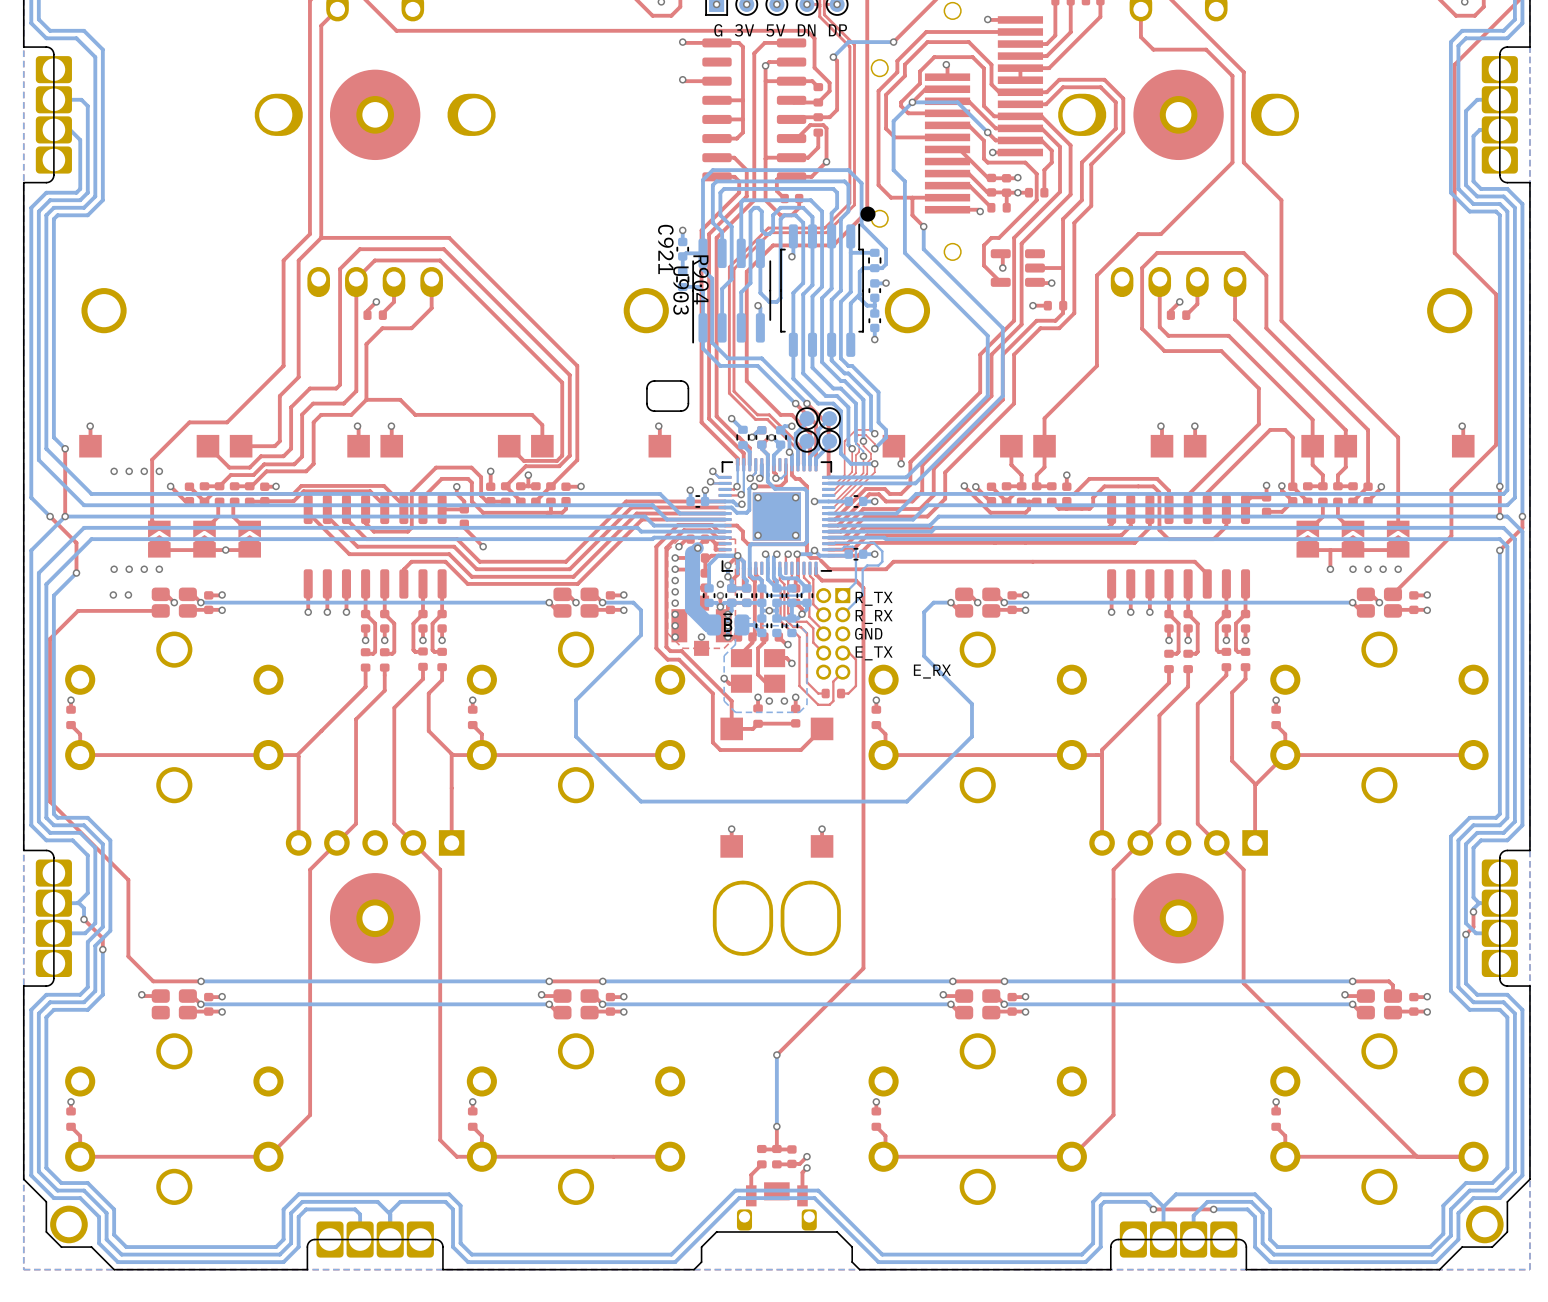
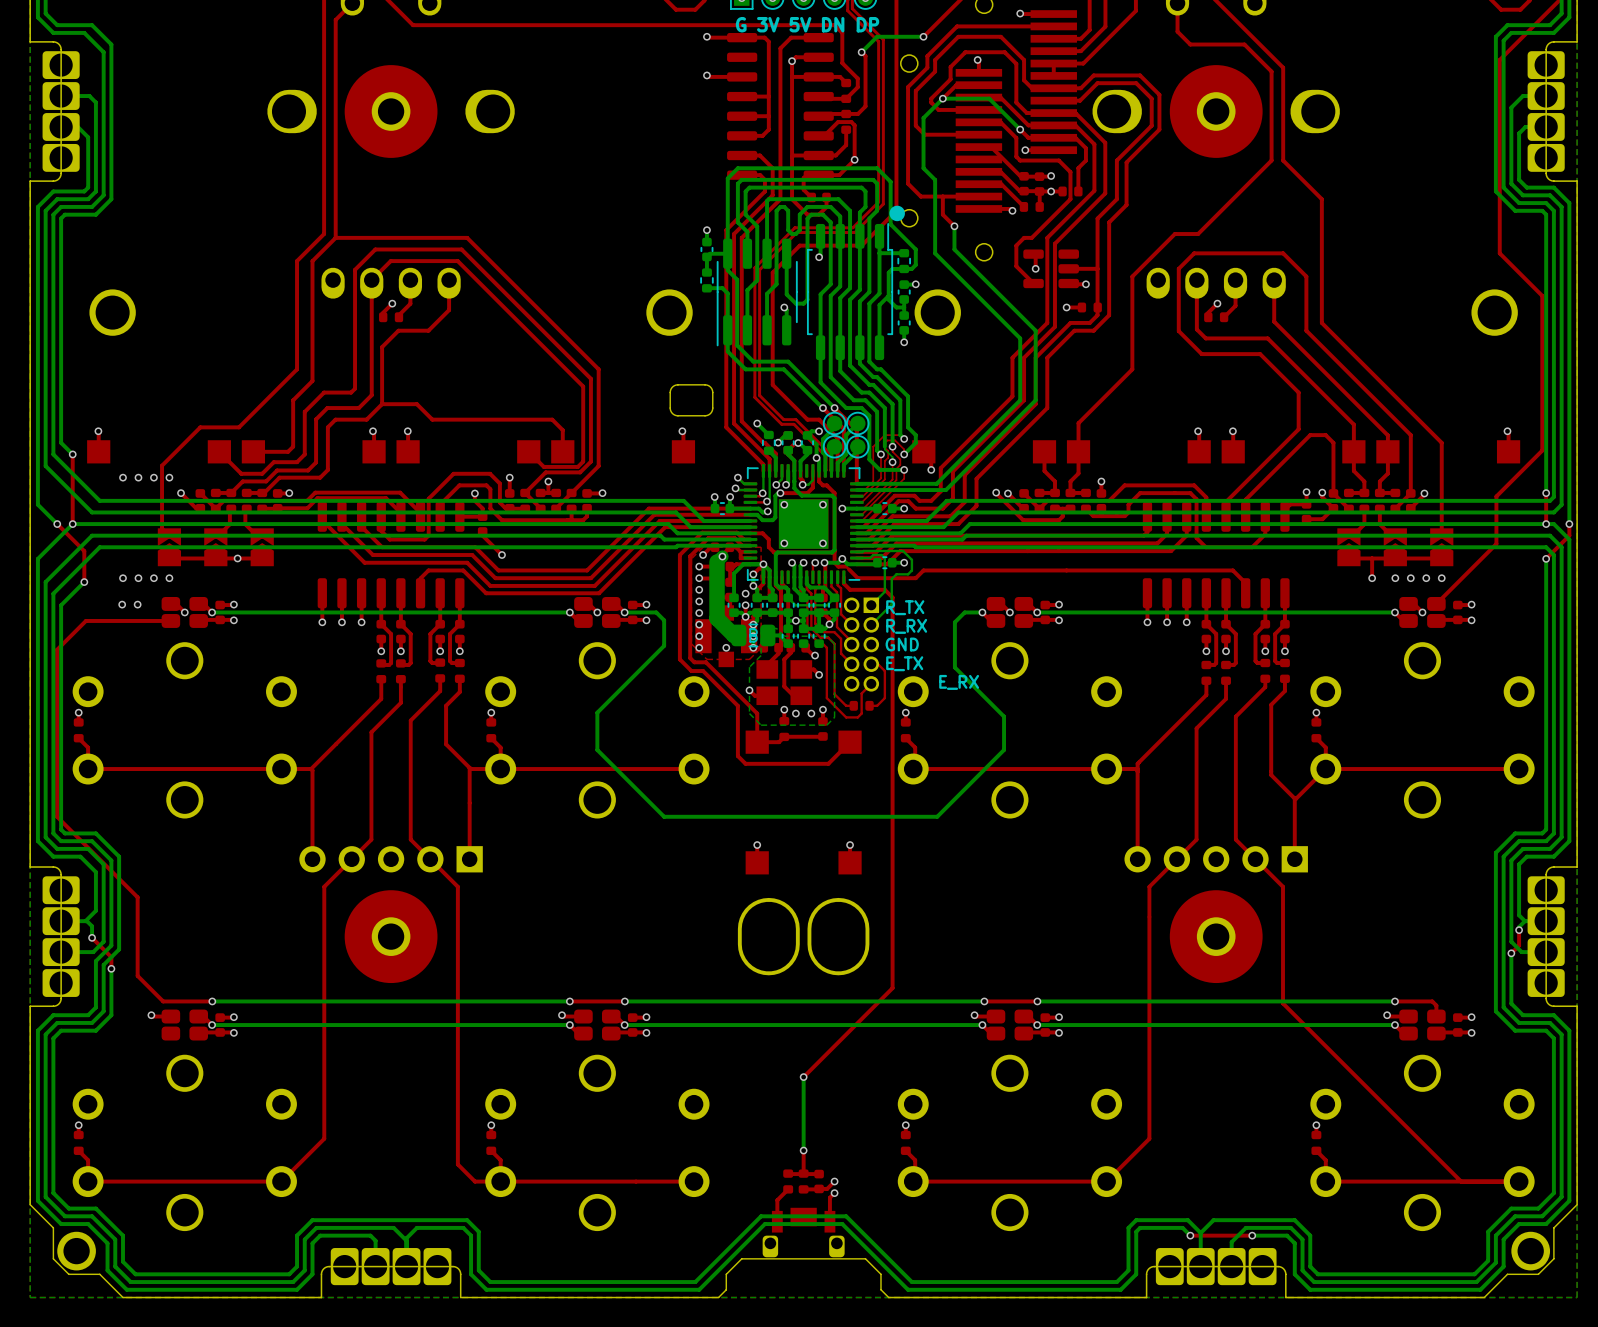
C921 name: C921 (665, 249) -> none
R904 name: R904 (700, 279) -> none
U903 name: U903 (681, 290) -> none

